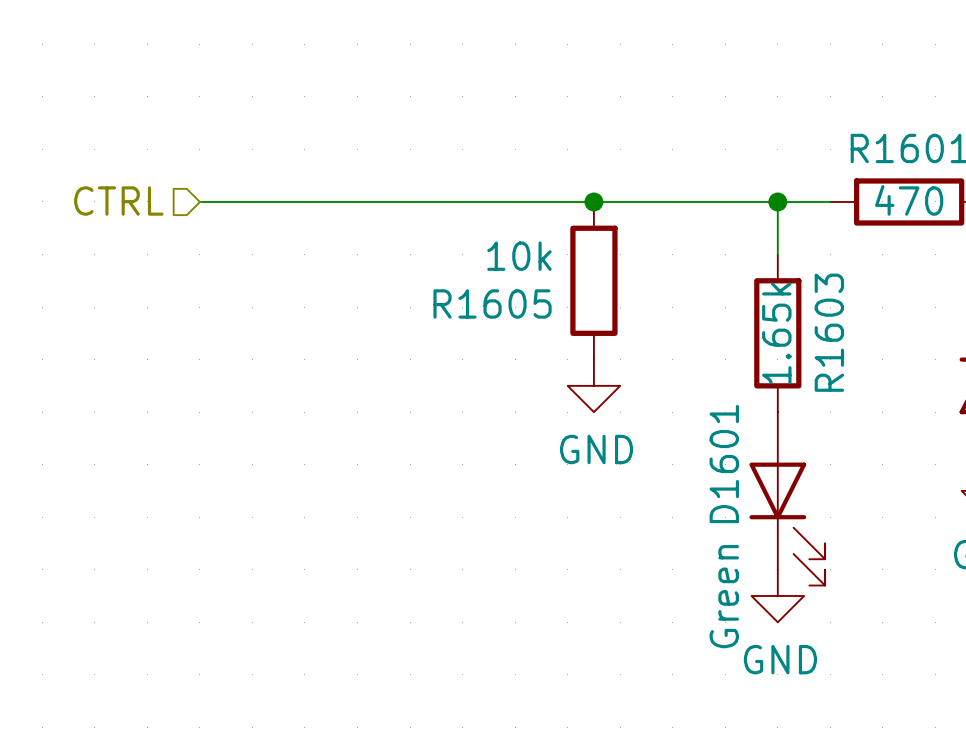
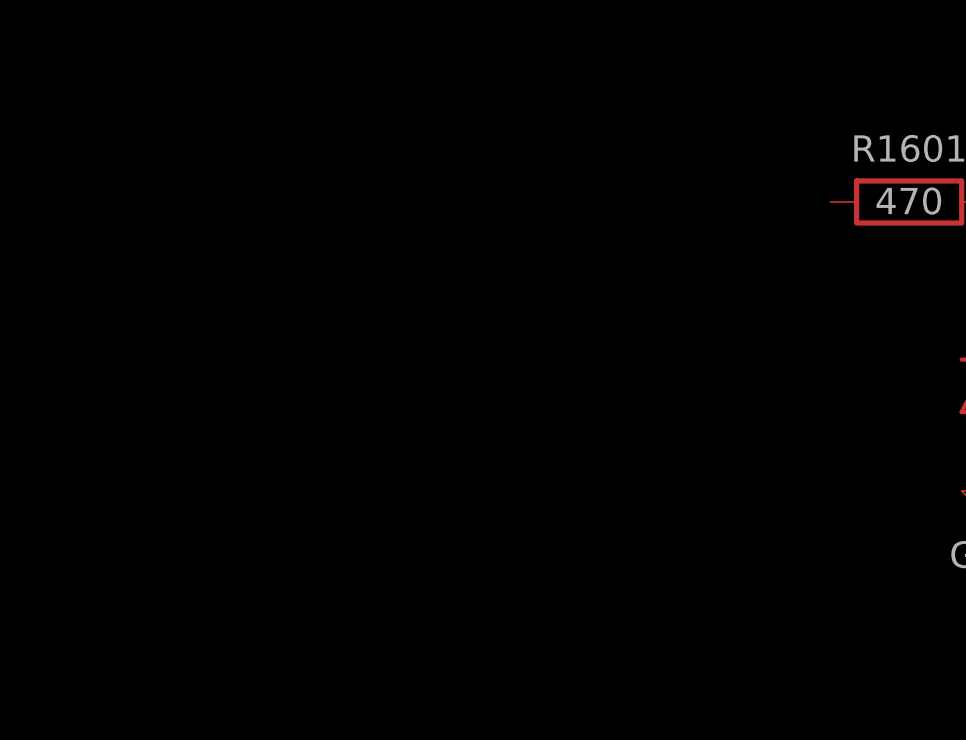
hierarchical label: CTRL (118, 201) -> none
wire: (199, 201) (830, 201) -> none
junction: (593, 201) -> none
wire: (777, 201) (777, 254) -> none
junction: (777, 201) -> none
R1605: 10k (593, 280) -> none
R1603: 1.65k (777, 333) -> none
power symbol: GND (593, 385) -> none
D1601: Green (787, 498) -> none
power symbol: GND (777, 596) -> none

